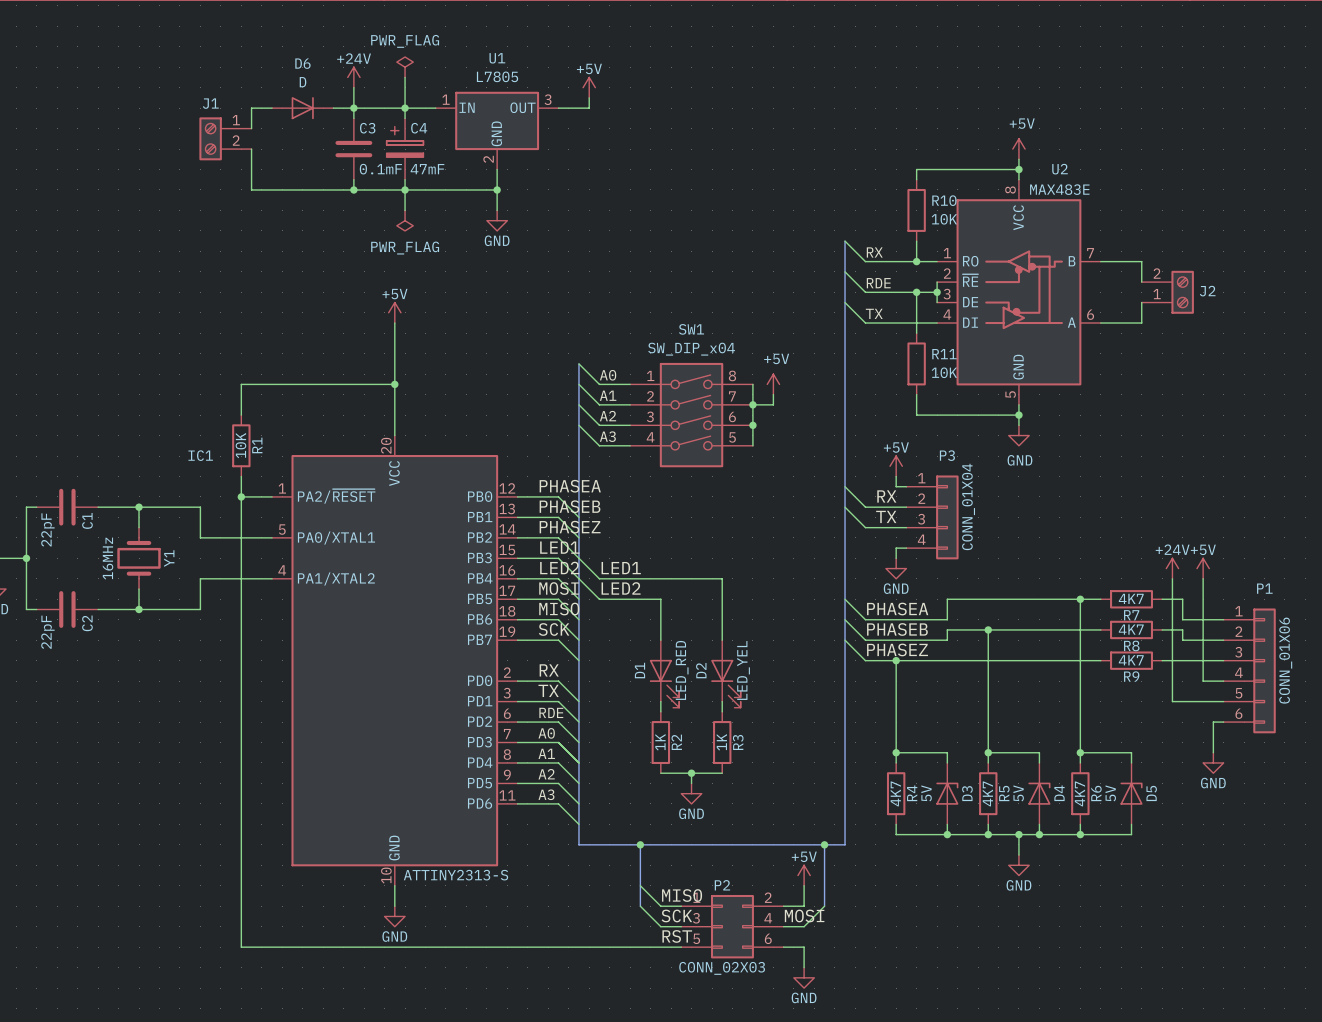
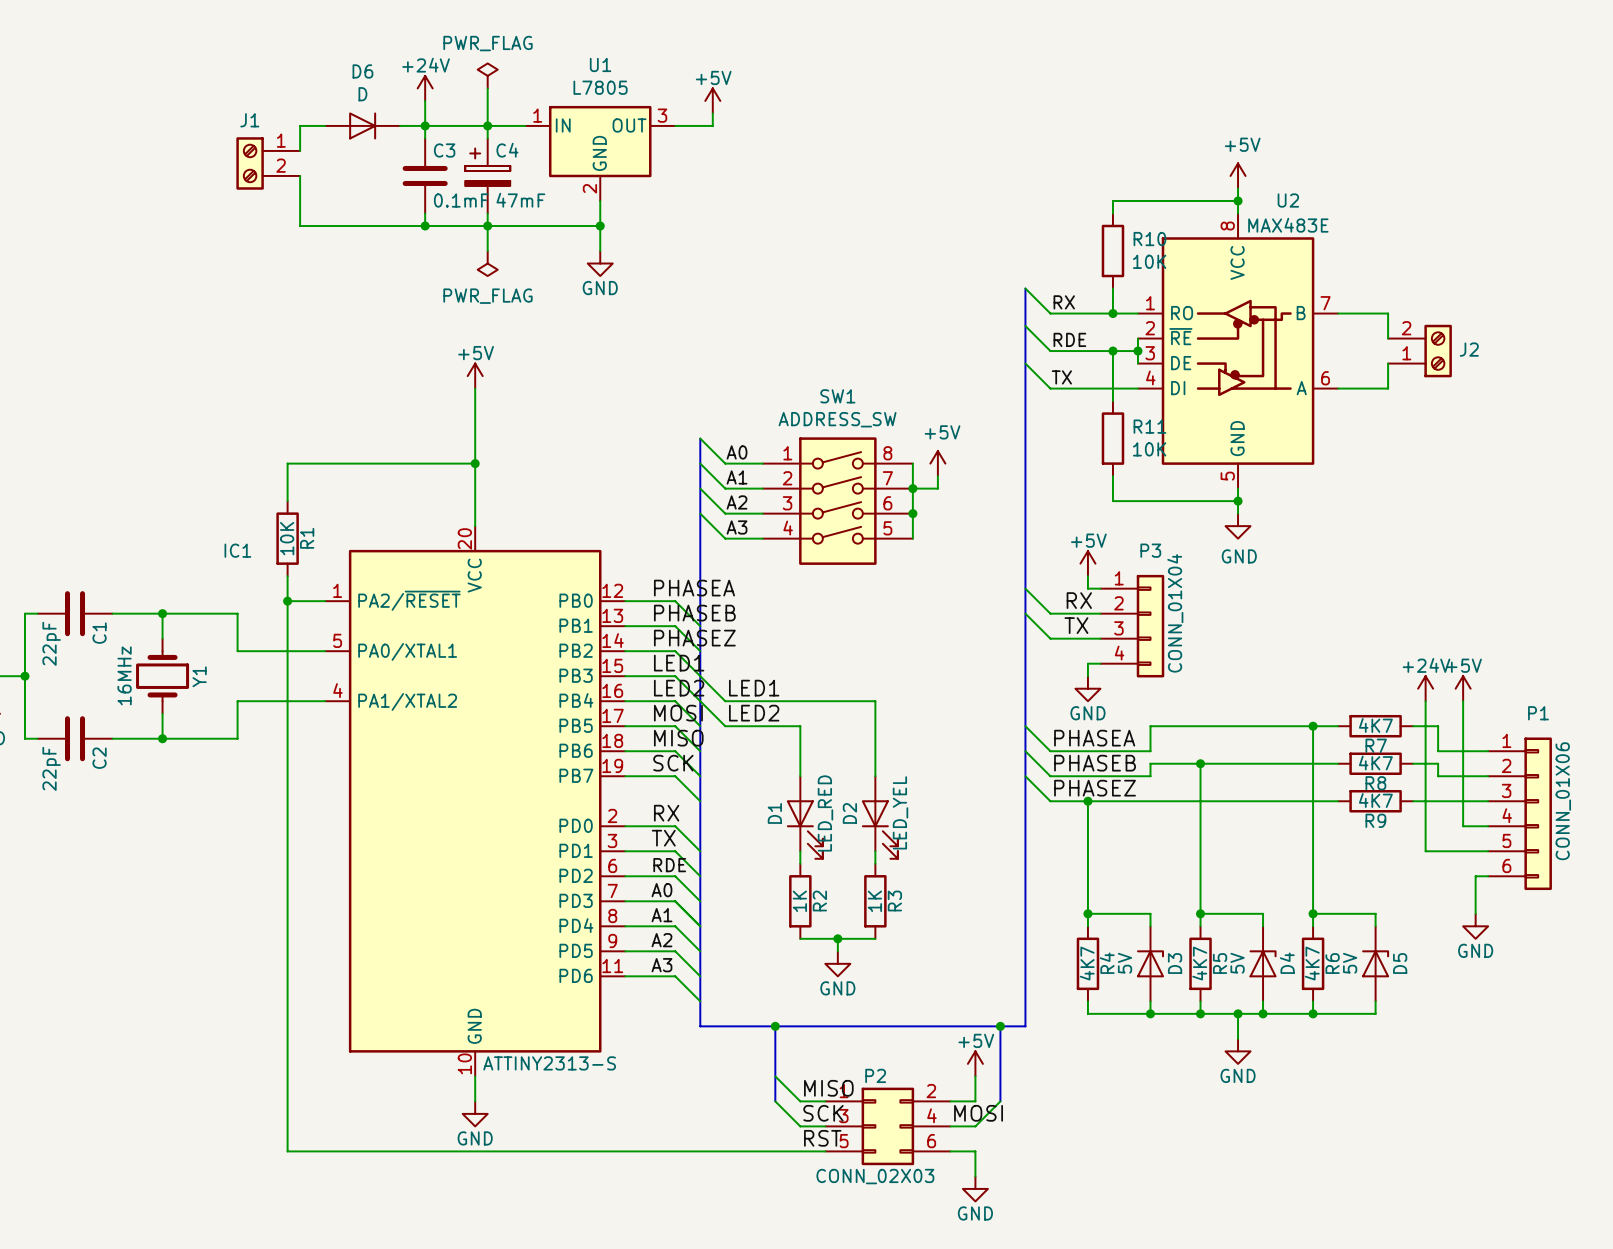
SW1 value: SW_DIP_x04 (691, 349) -> ADDRESS_SW (837, 419)

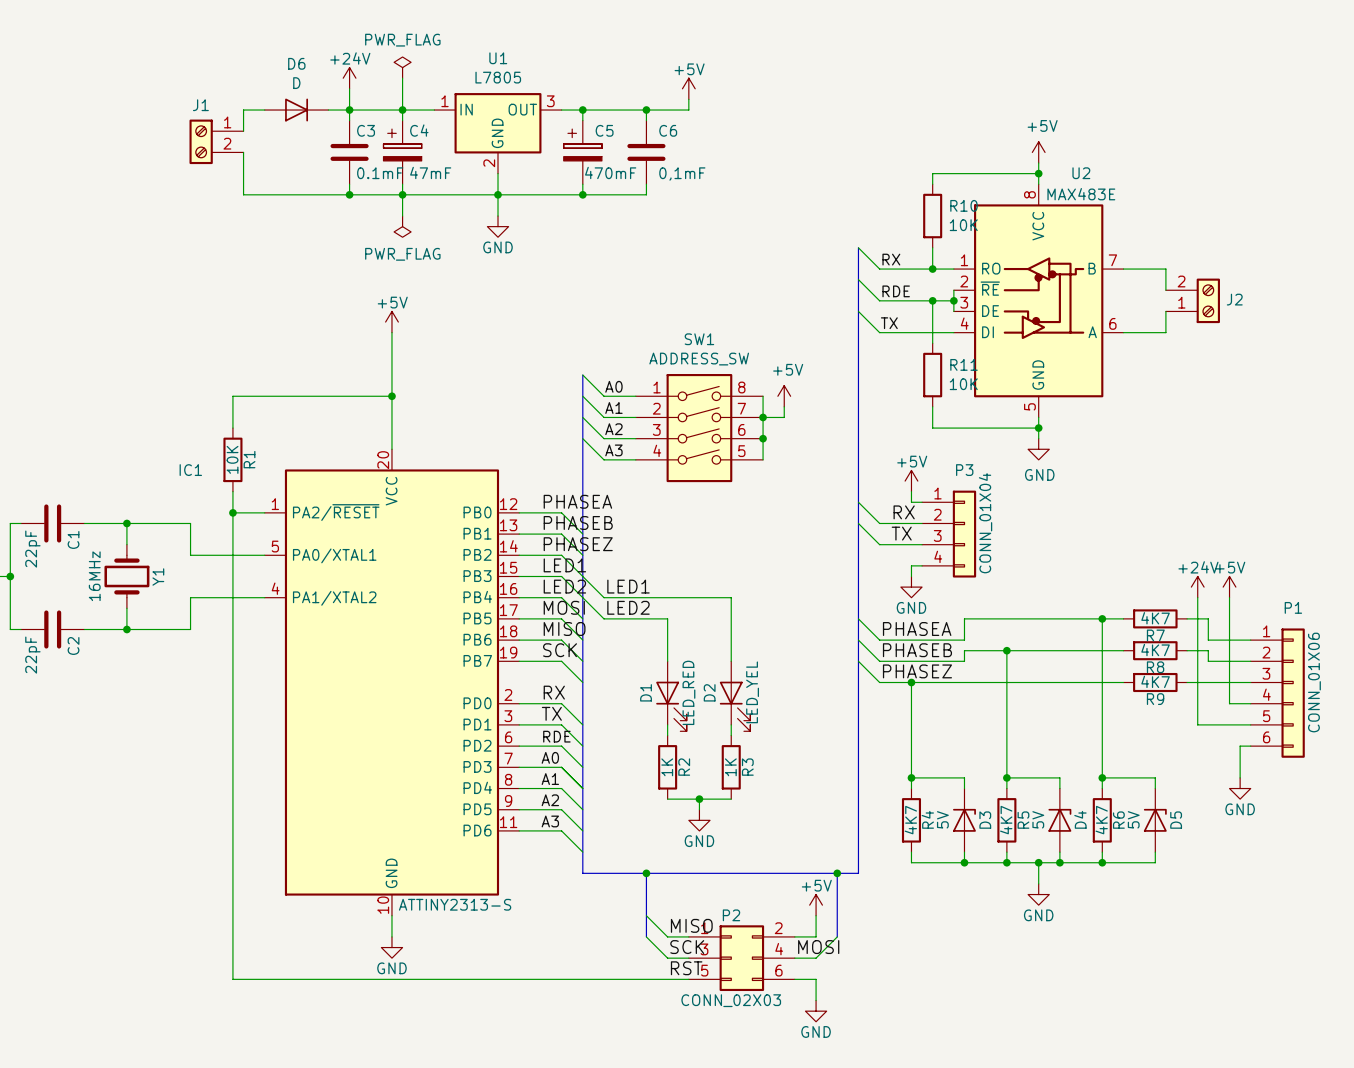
power symbol position: +5V (712, 100) -> +5V (688, 88)
wire: (712, 113) (712, 125) -> (688, 99) (688, 110) (593, 110)
wire: none -> (582, 110) (582, 120)
junction: none -> (582, 110)
wire: none -> (646, 110) (646, 120)
junction: none -> (646, 110)
C5: none -> 470mF (582, 152)
C6: none -> 0,1mF (646, 152)
wire: none -> (582, 184) (582, 194)
wire: none -> (646, 184) (646, 194) (498, 194)
junction: none -> (582, 194)

